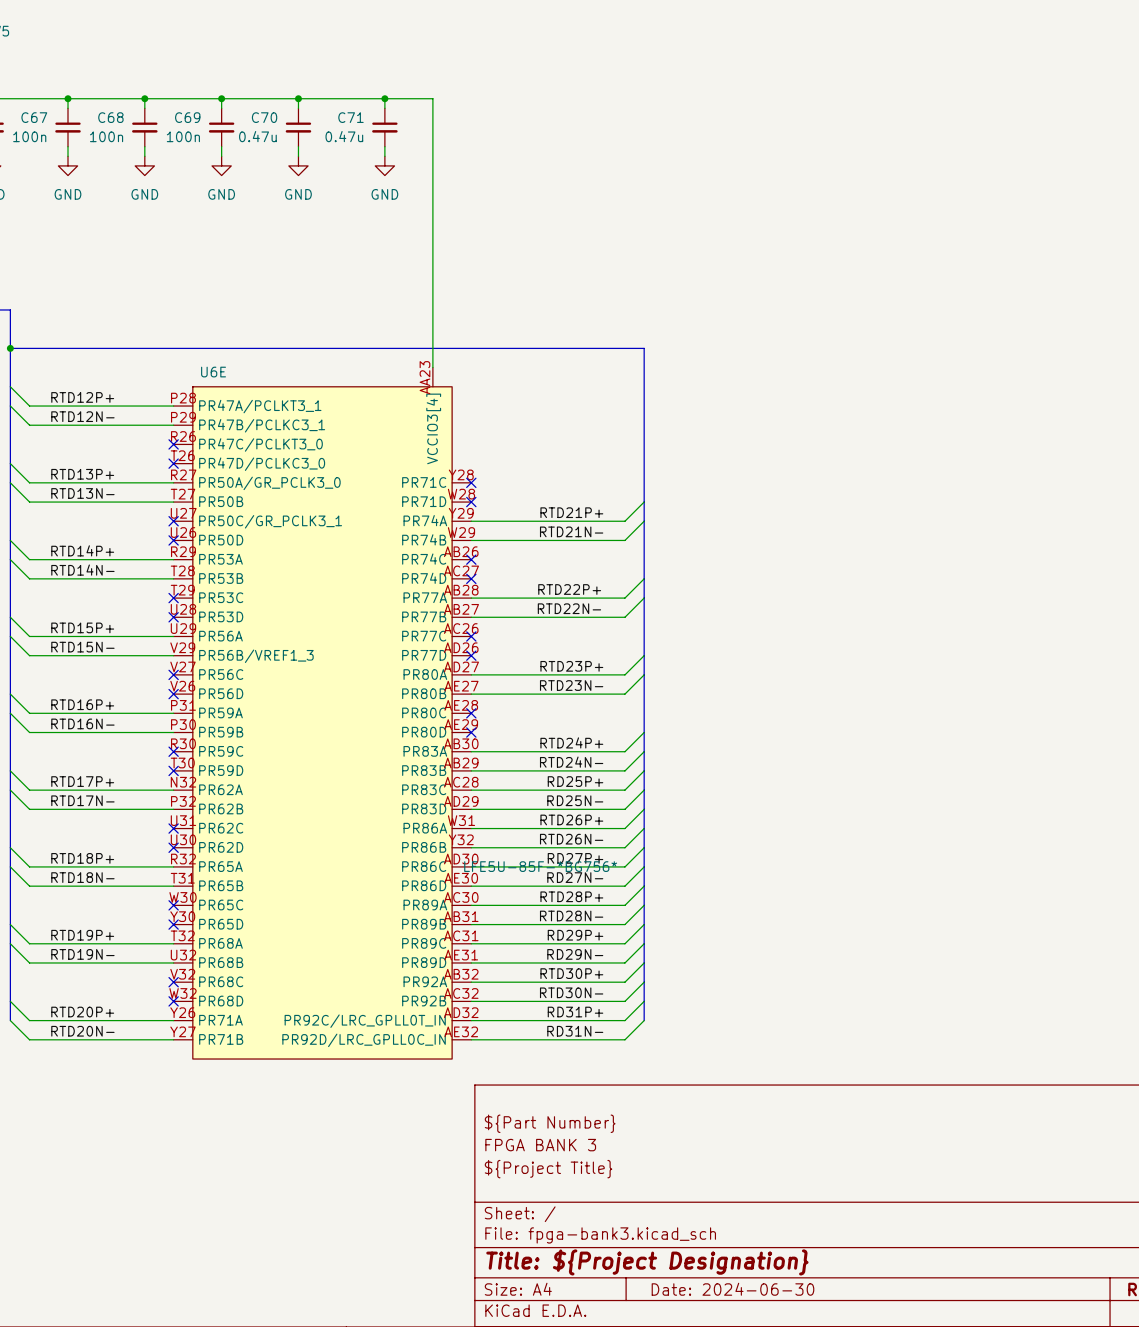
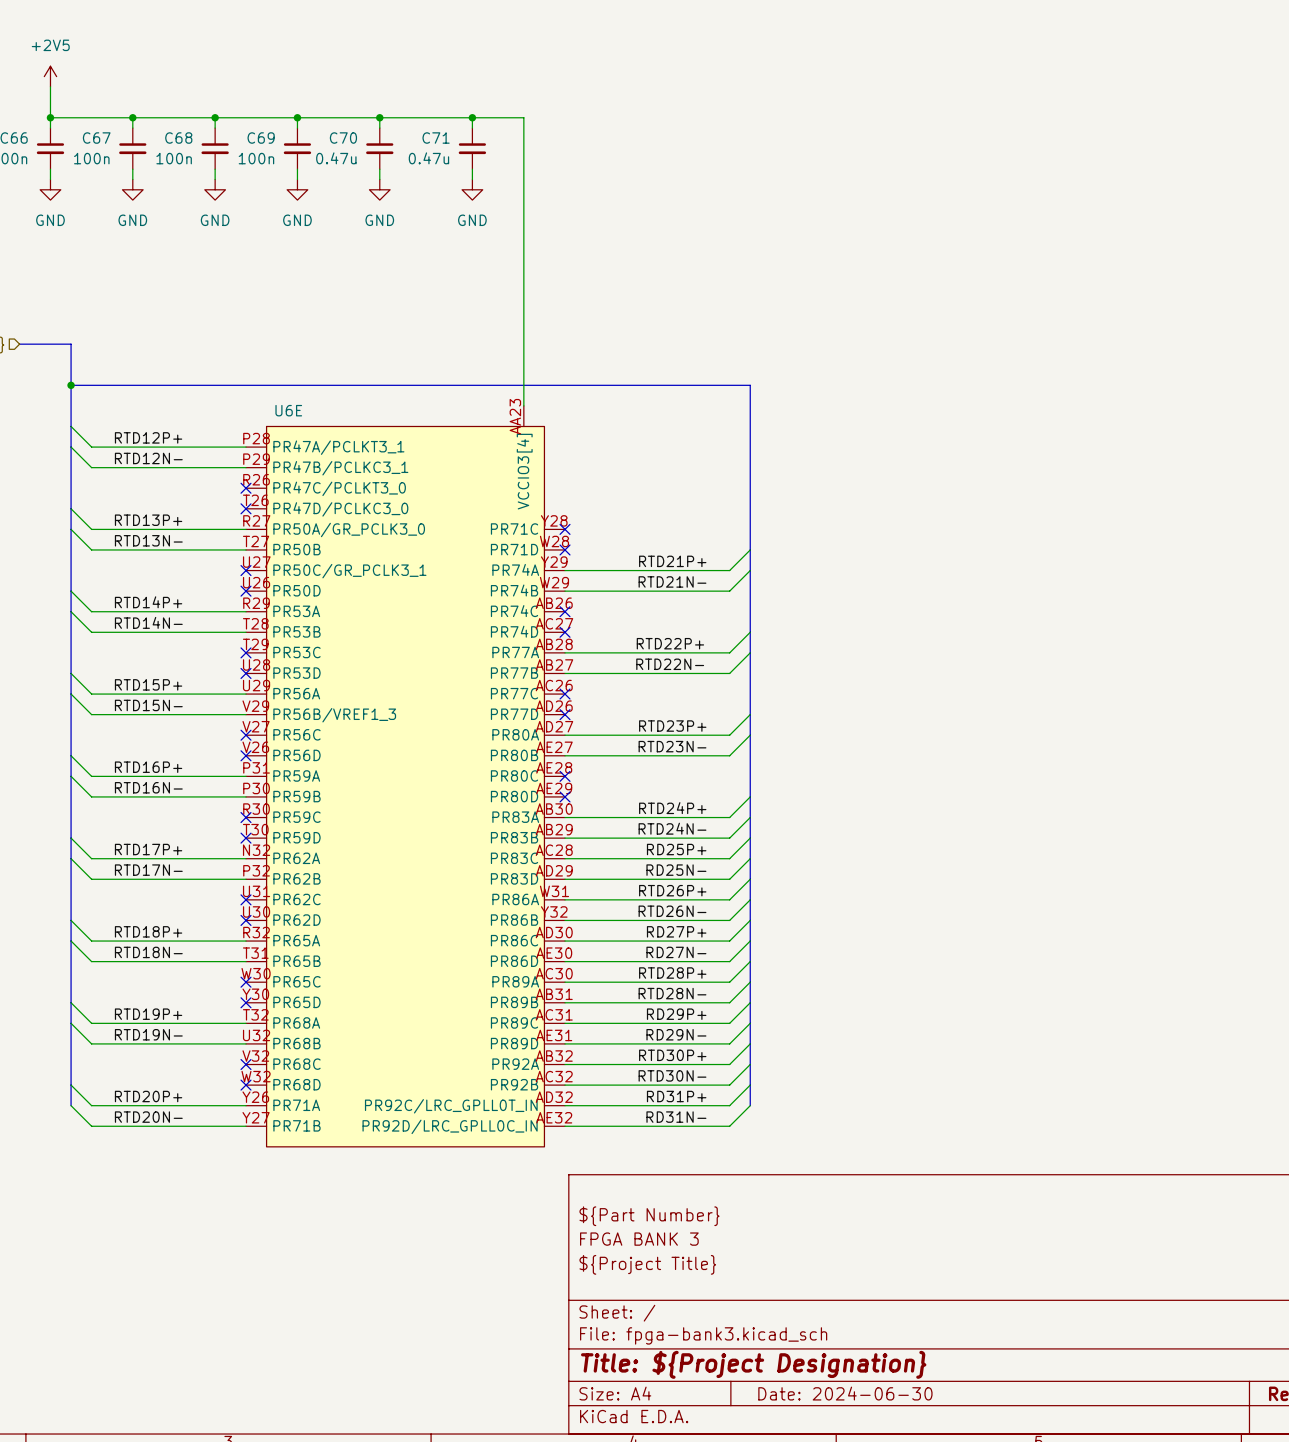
U6E value: LFE5U-85F-*BG756* (540, 866) -> none

